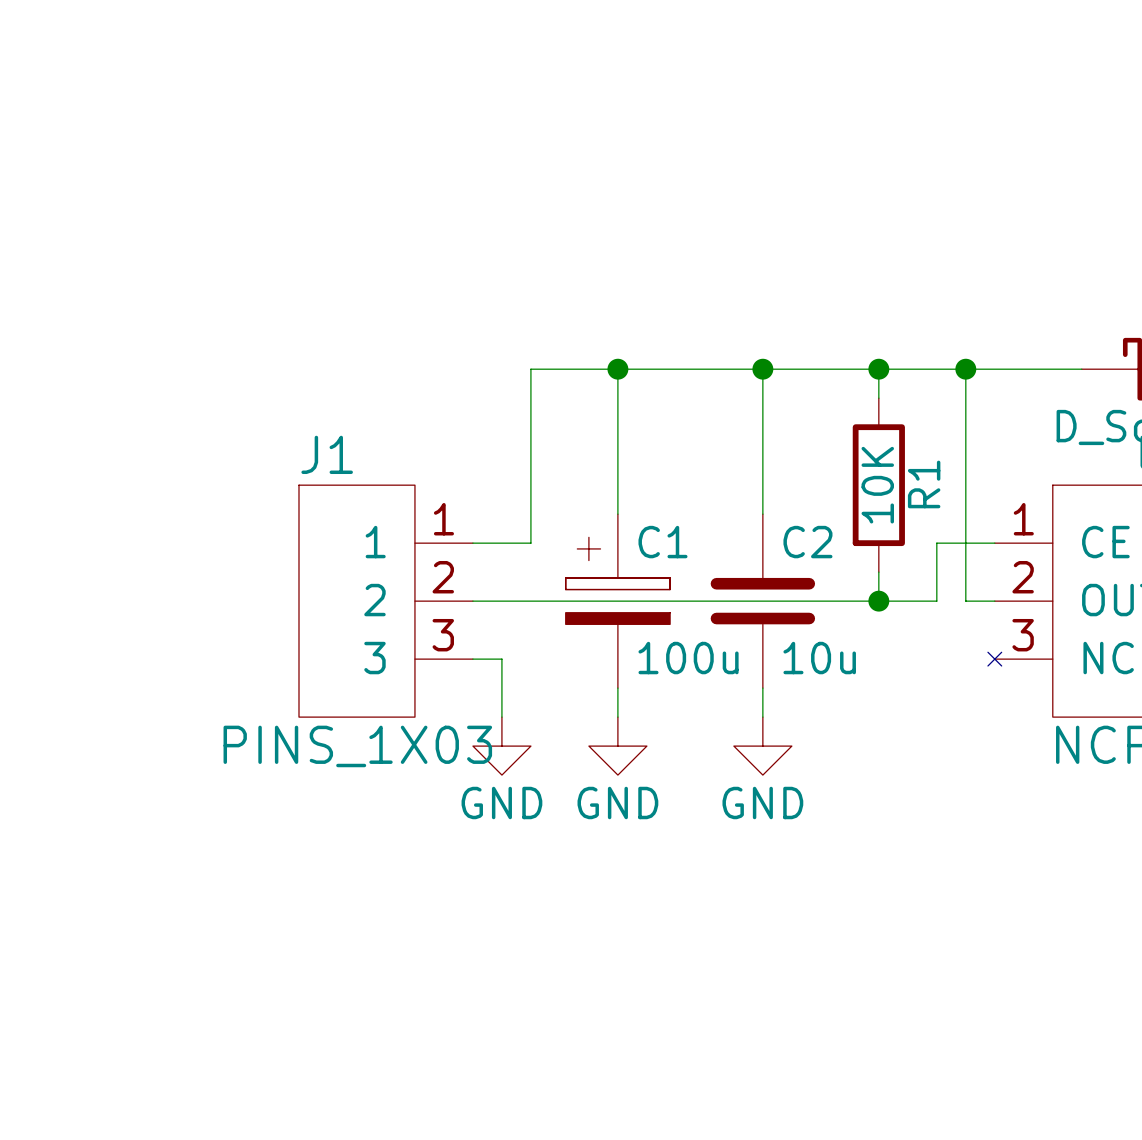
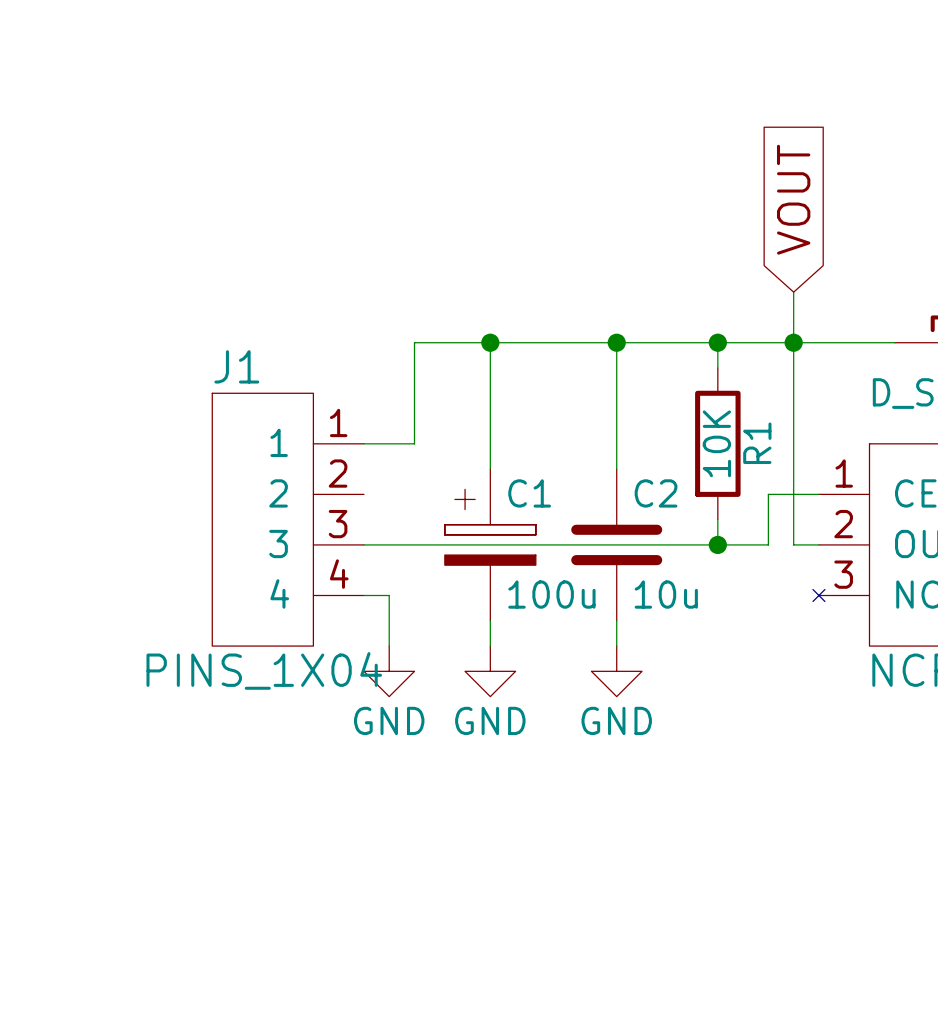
global label: none -> VOUT (793, 199)
wire: none -> (793, 292) (793, 342)
J1 symbol: [298, 485, 473, 718] -> [212, 393, 364, 647]
wire: (530, 485) (530, 543) (472, 543) -> (414, 443) (363, 443)
J1 value: PINS_1X03 (357, 746) -> PINS_1X04 (264, 670)

